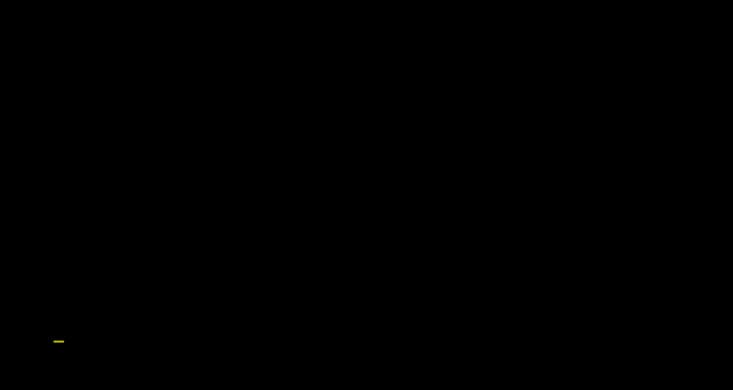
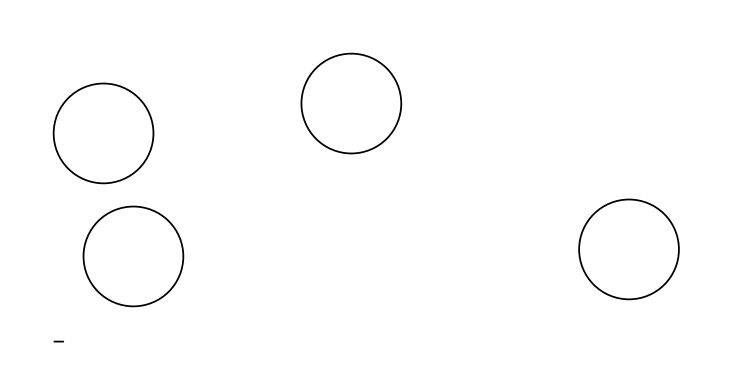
round board edge: none -> [300, 52, 403, 155]
round board edge: none -> [52, 82, 155, 185]
round board edge: none -> [578, 198, 680, 301]
round board edge: none -> [82, 205, 185, 308]

